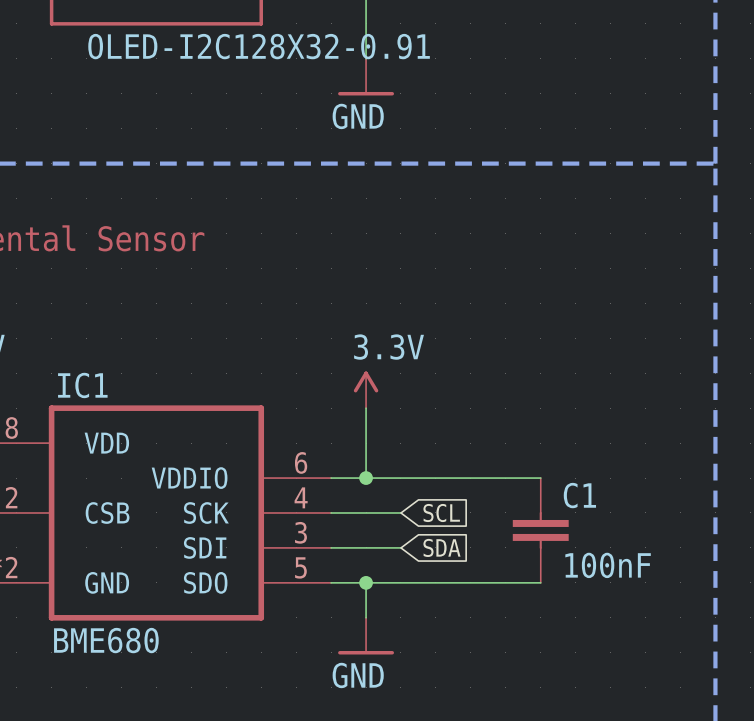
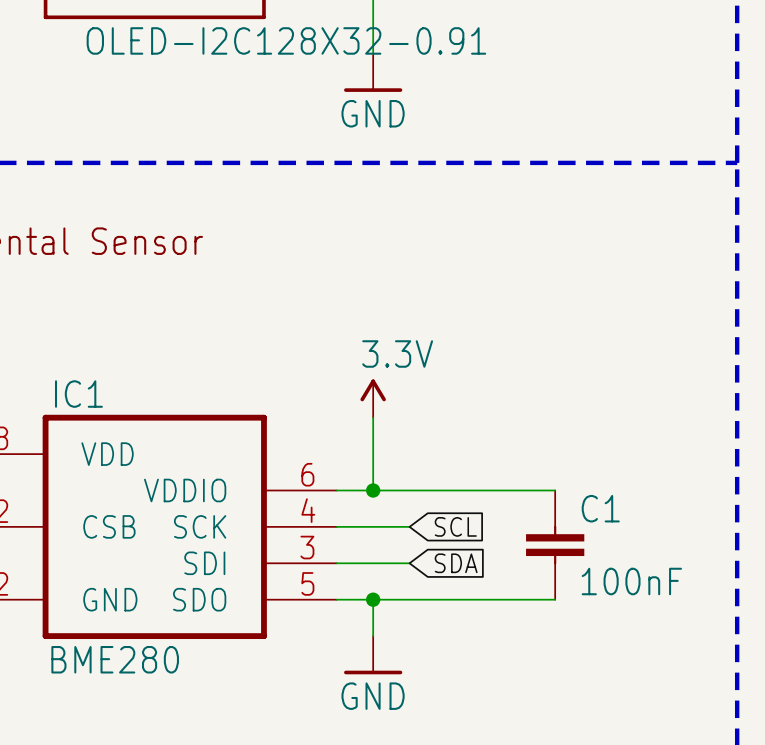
IC1 value: BME680 (106, 640) -> BME280 (115, 659)

